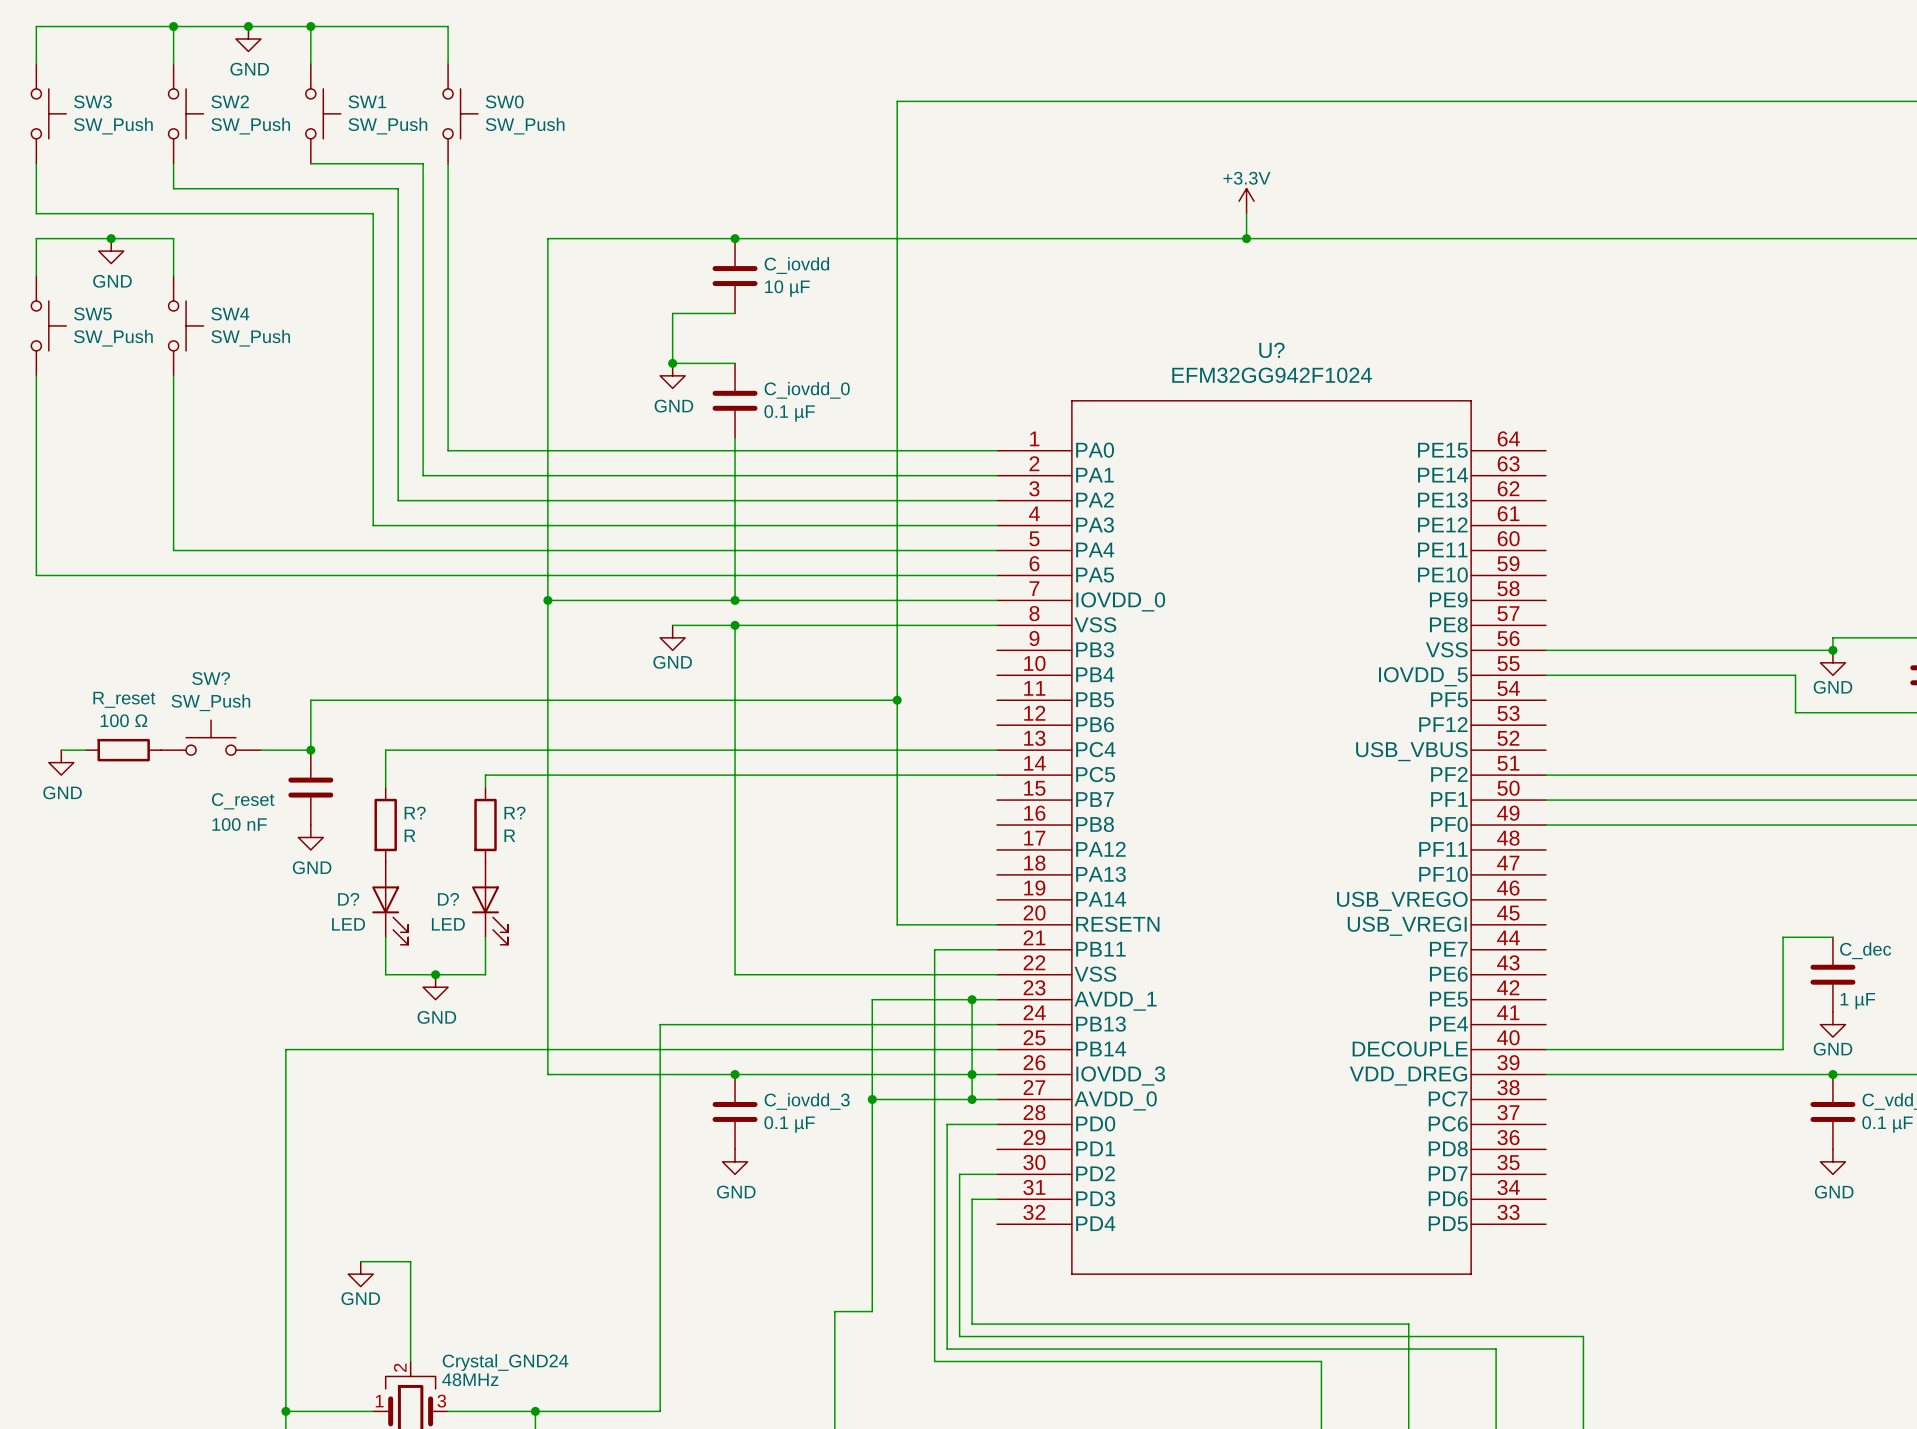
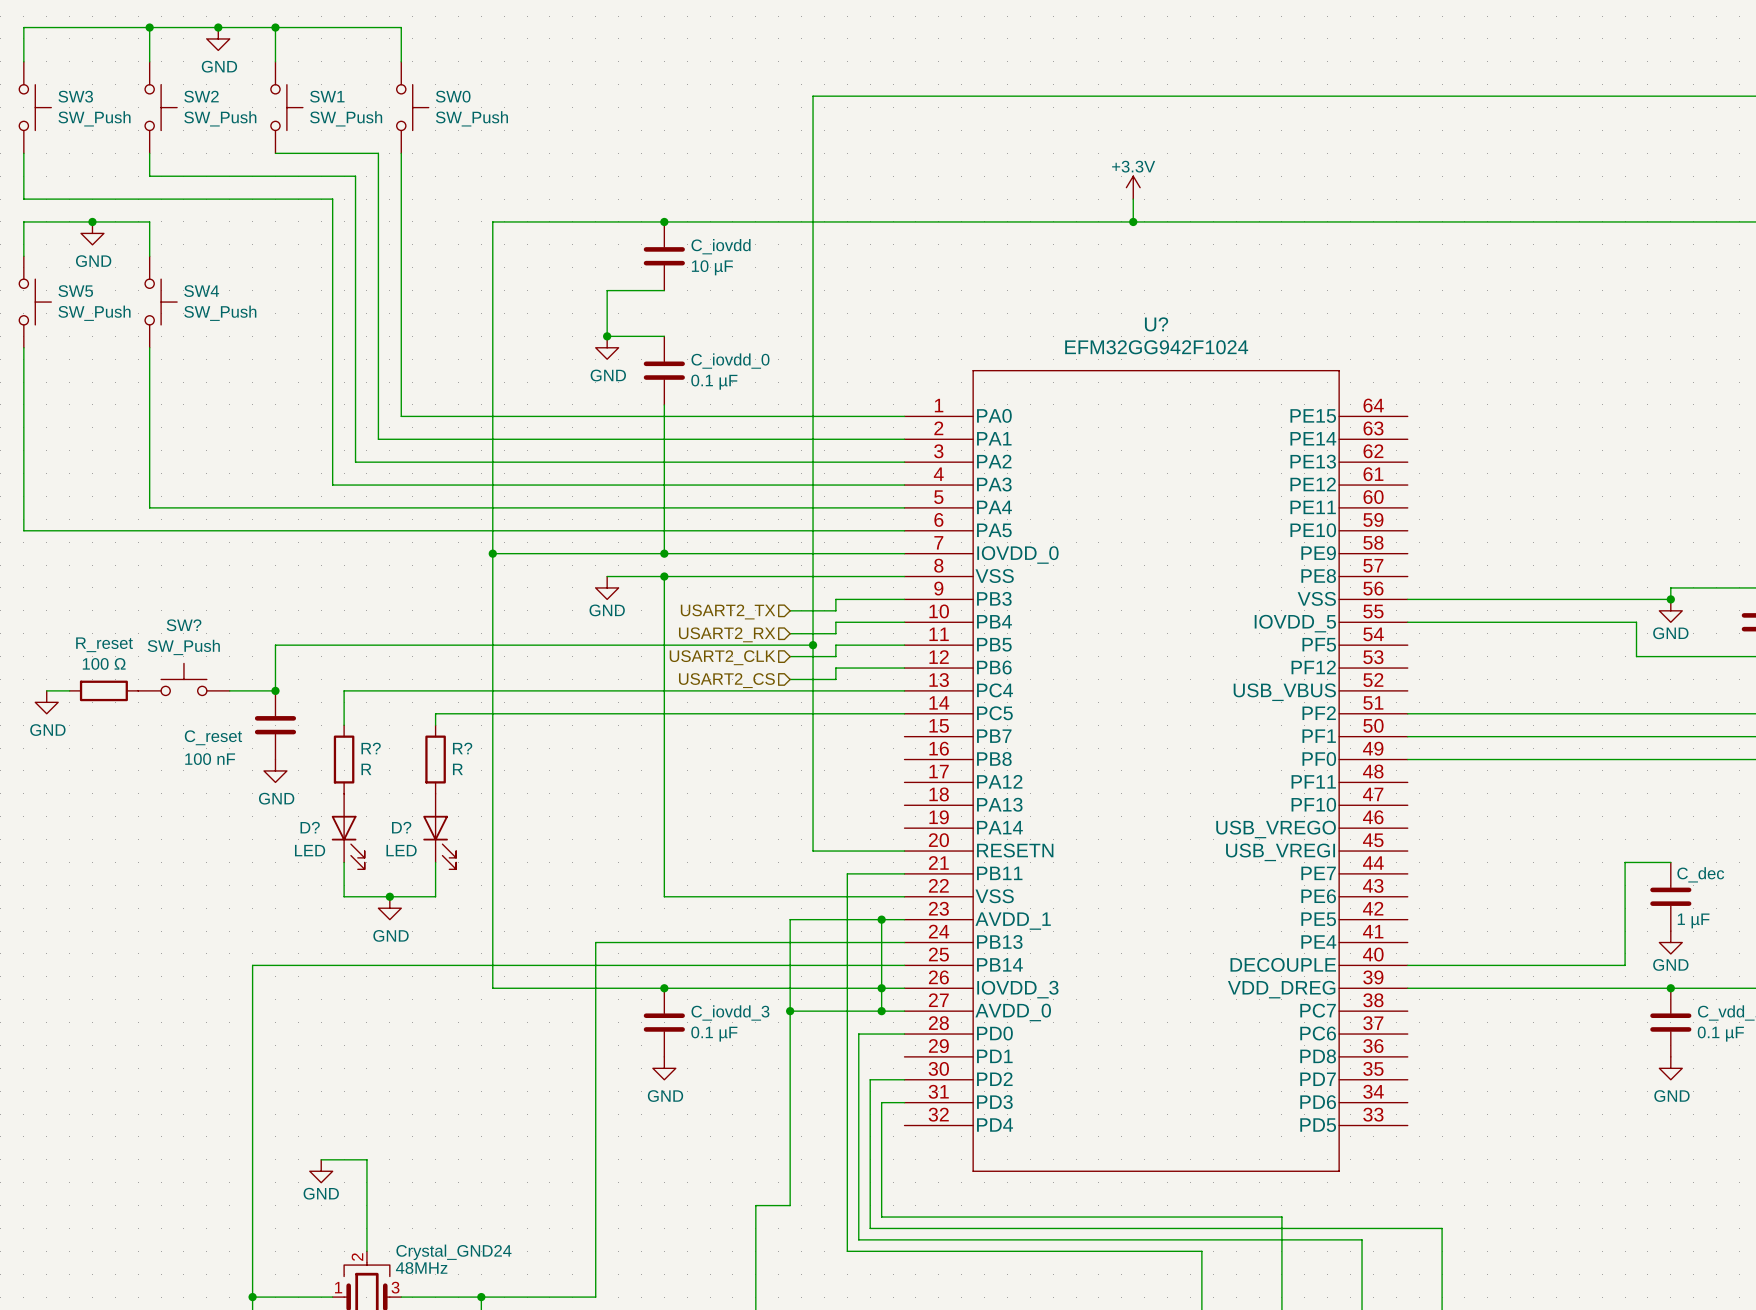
wire: none -> (904, 599) (835, 599) (835, 610) (790, 610)
hierarchical label: none -> USART2_TX (728, 611)
wire: none -> (904, 622) (835, 622) (835, 633) (790, 633)
hierarchical label: none -> USART2_RX (727, 634)
wire: none -> (904, 645) (835, 645) (835, 656) (790, 656)
hierarchical label: none -> USART2_CLK (722, 657)
wire: none -> (904, 668) (835, 668) (835, 679) (790, 679)
hierarchical label: none -> USART2_CS (726, 680)

